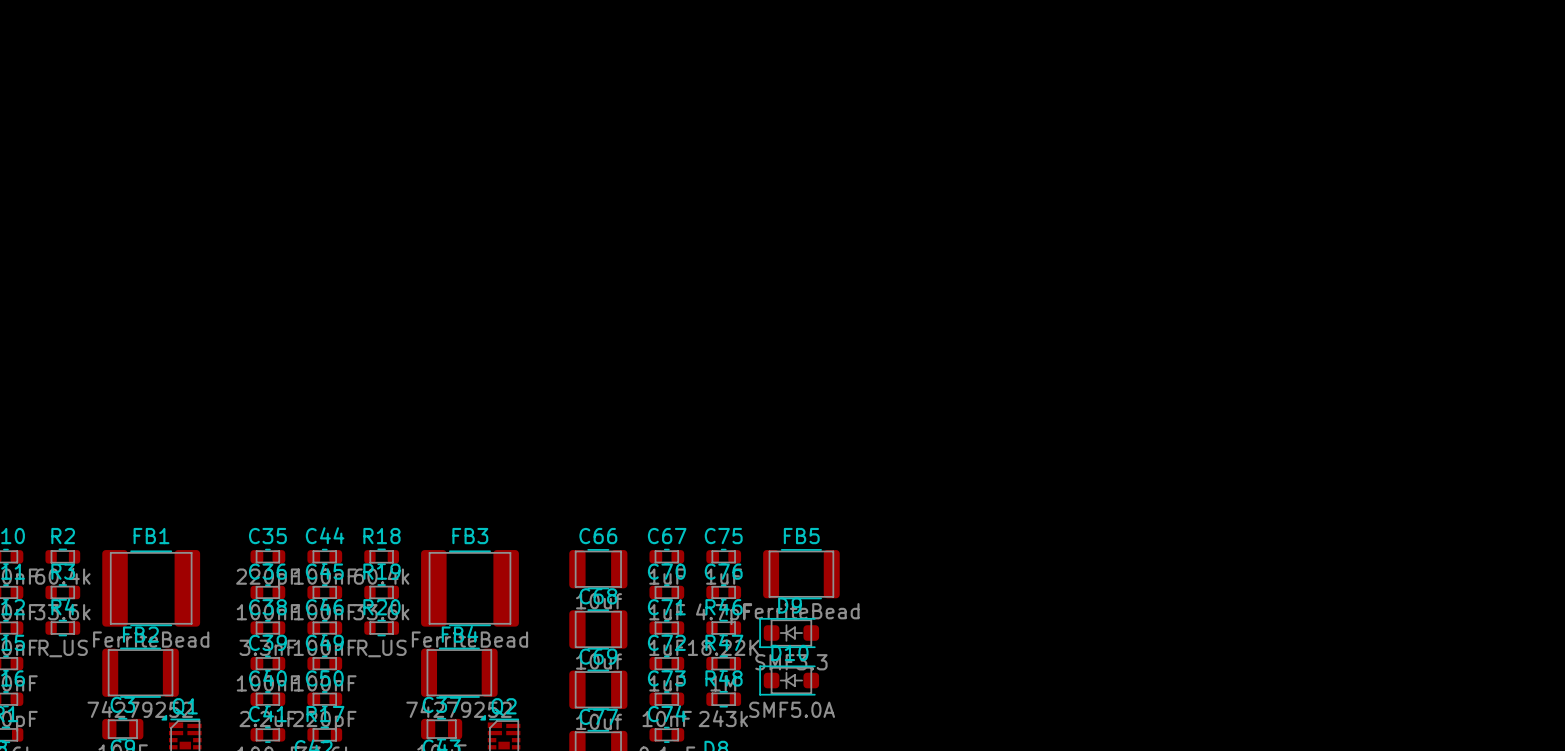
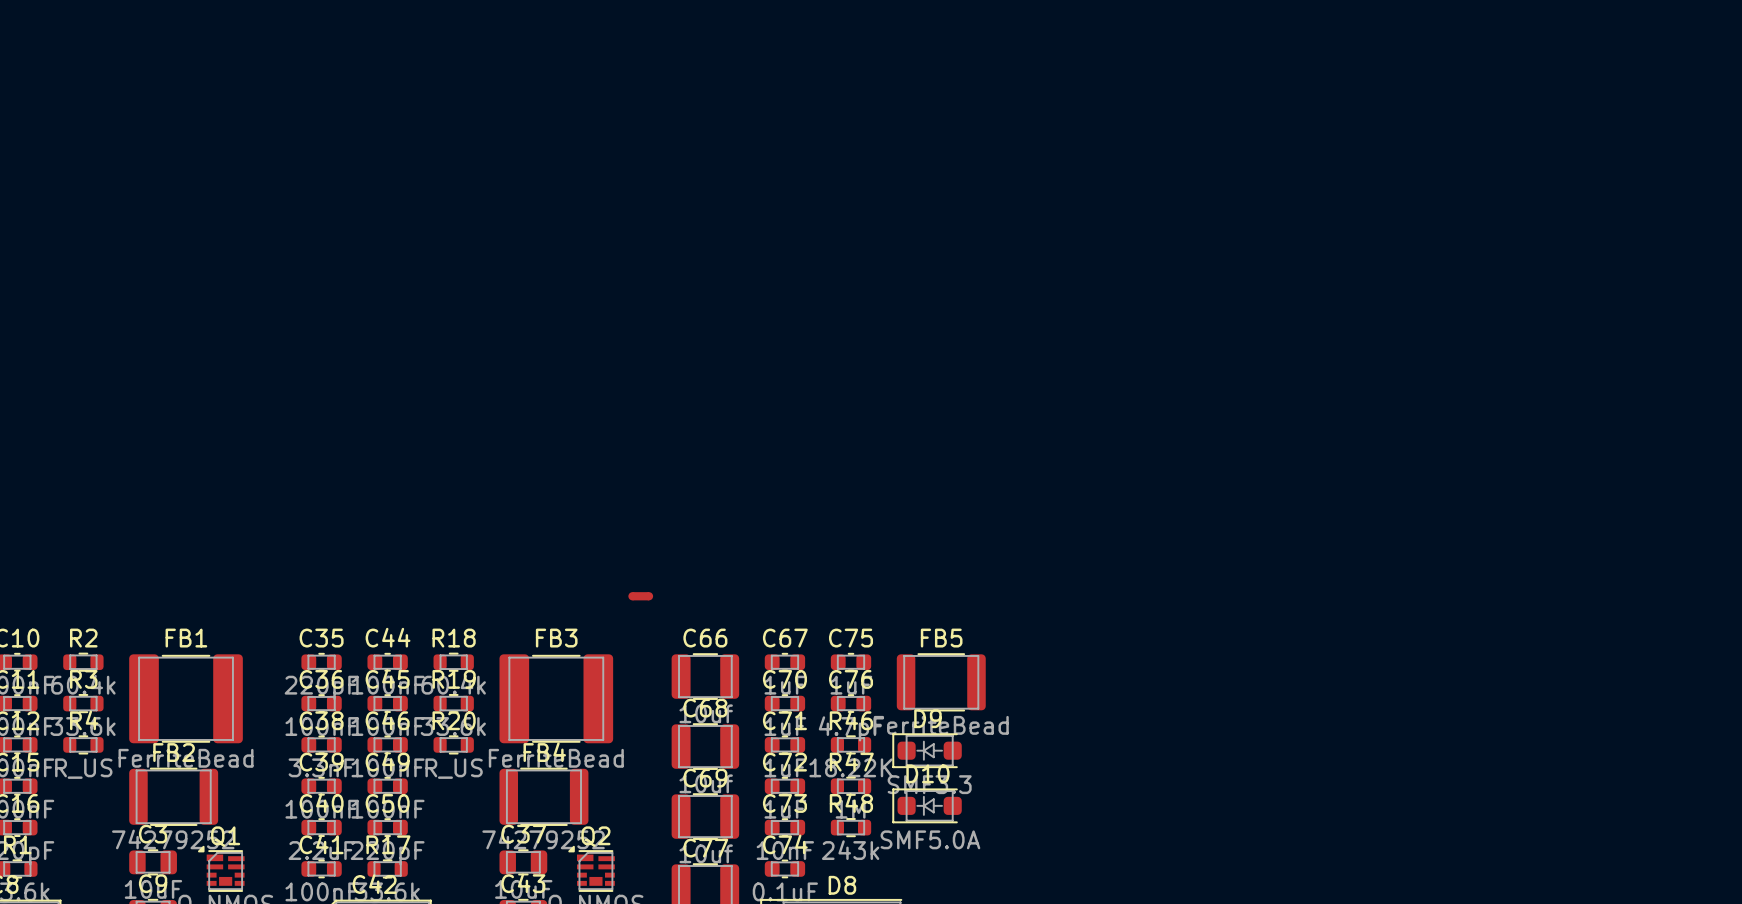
part: none -> (640, 596)

